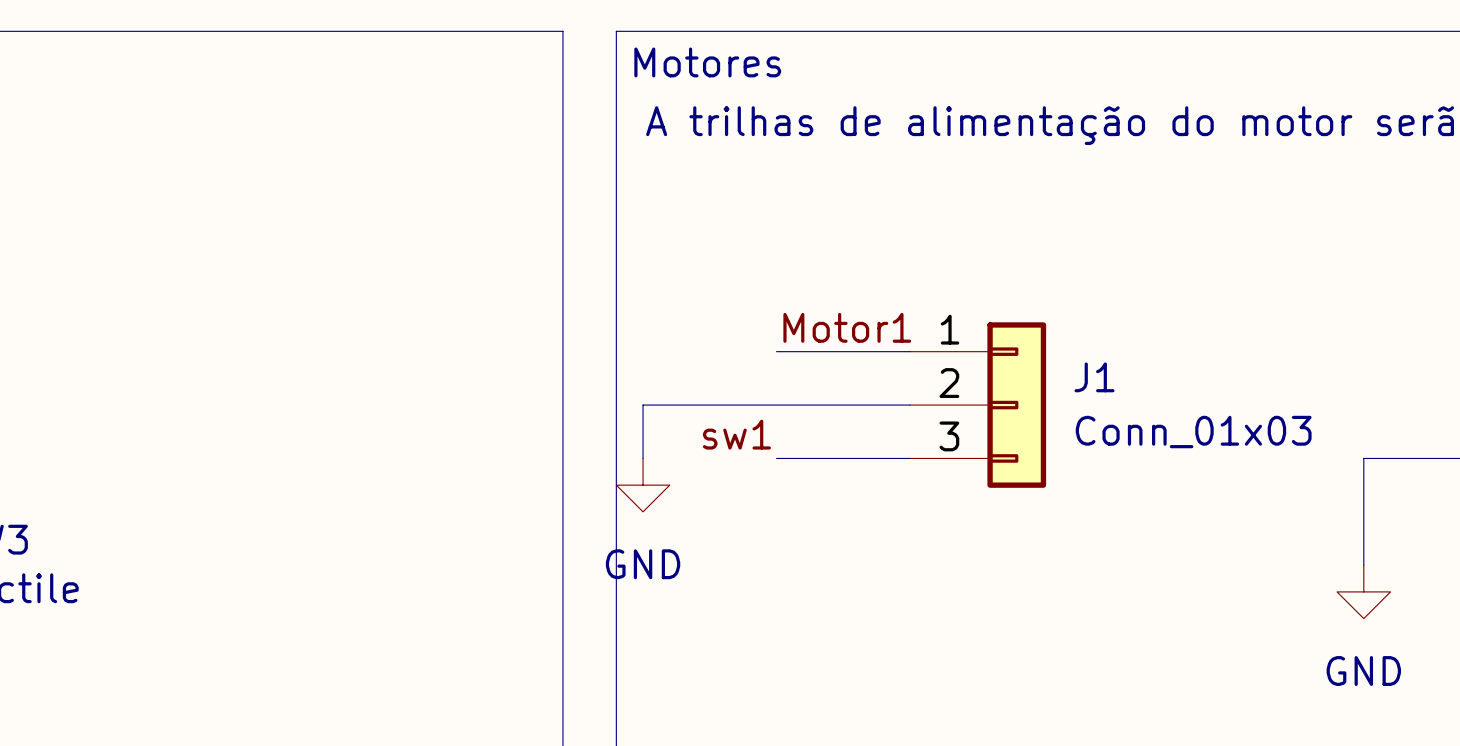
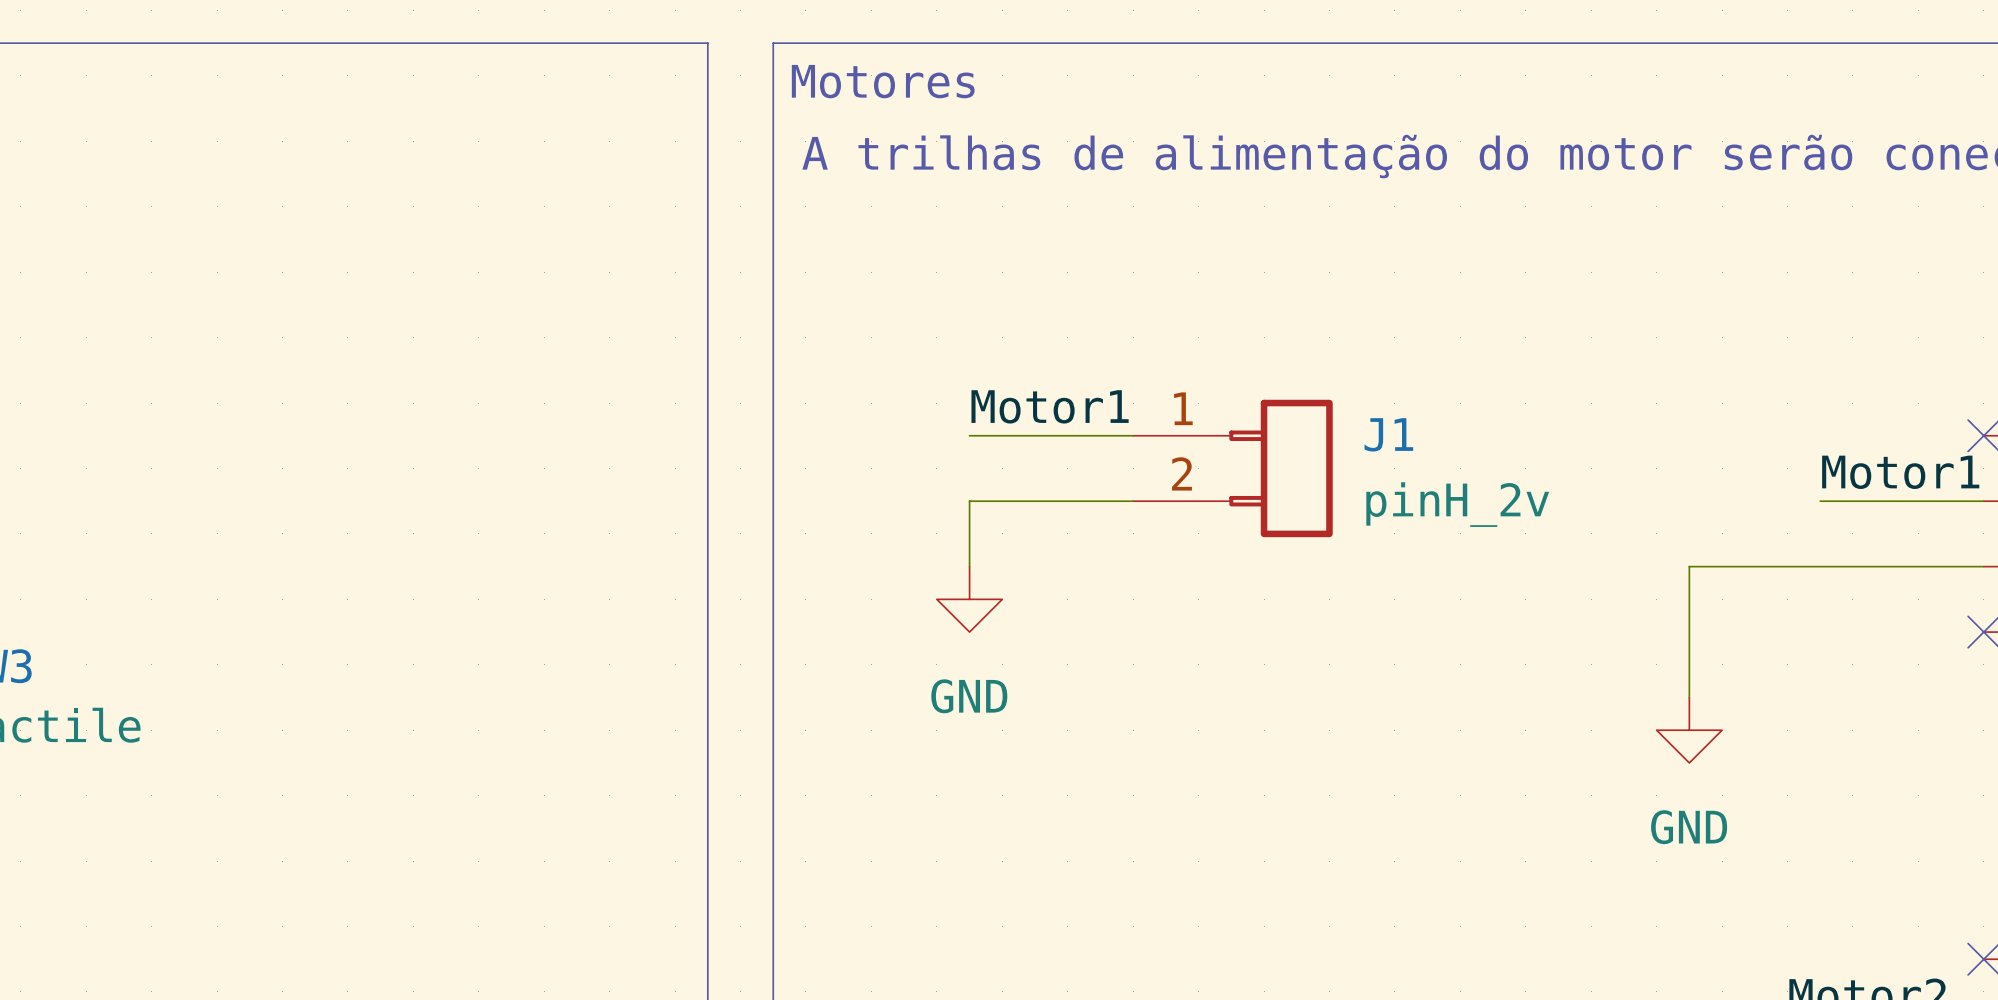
J1 symbol: [909, 322, 1047, 488] -> [1133, 399, 1333, 538]
wire: (776, 405) (643, 405) (643, 458) -> (969, 501) (969, 566)
J1 value: Conn_01x03 (1193, 432) -> pinH_2v (1457, 504)
label: sw1 (736, 434) -> none
wire: (776, 458) (909, 458) -> none
power symbol position: GND (643, 485) -> GND (969, 599)

